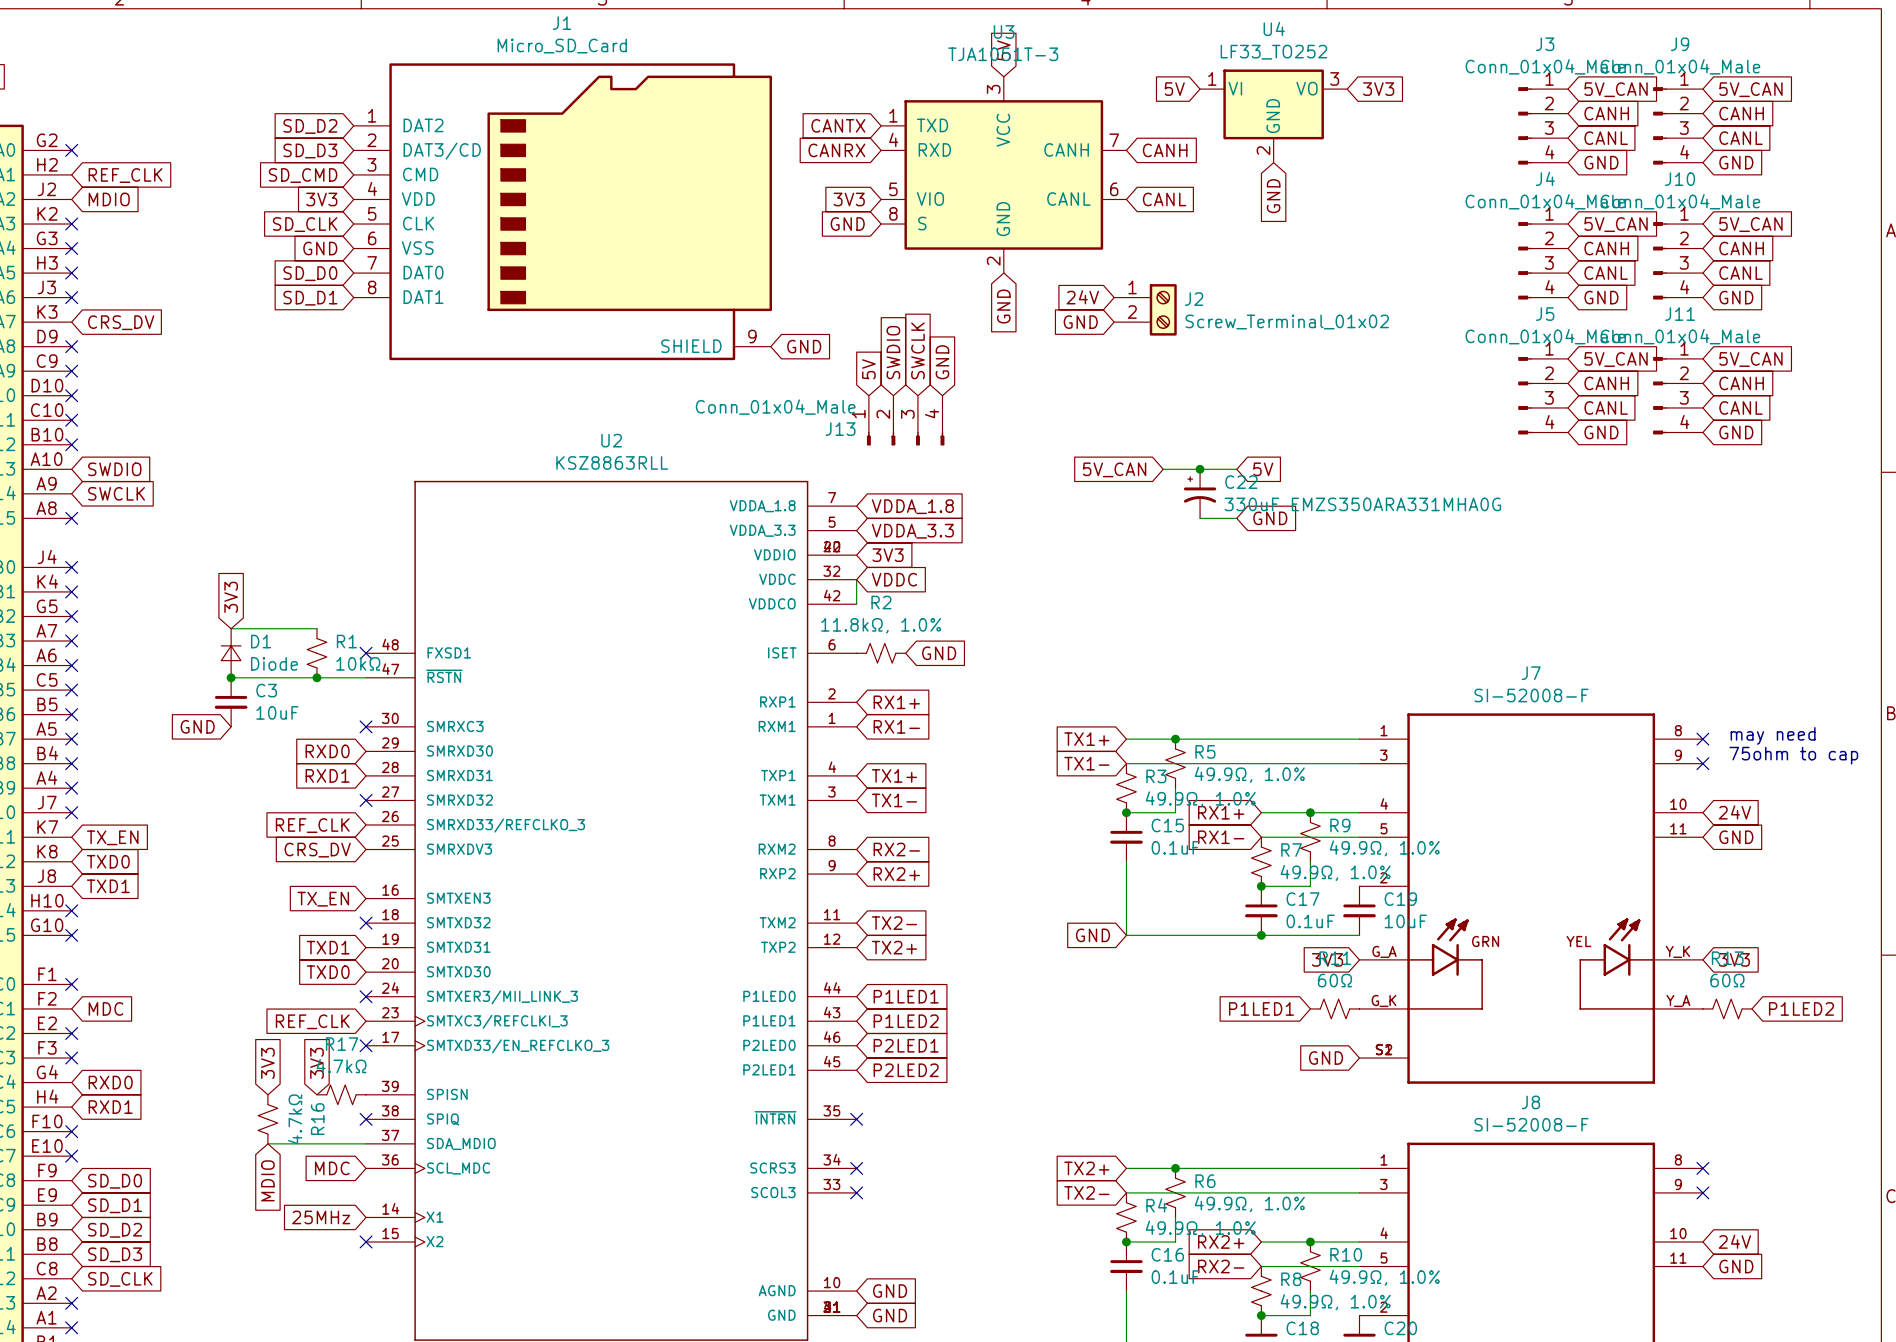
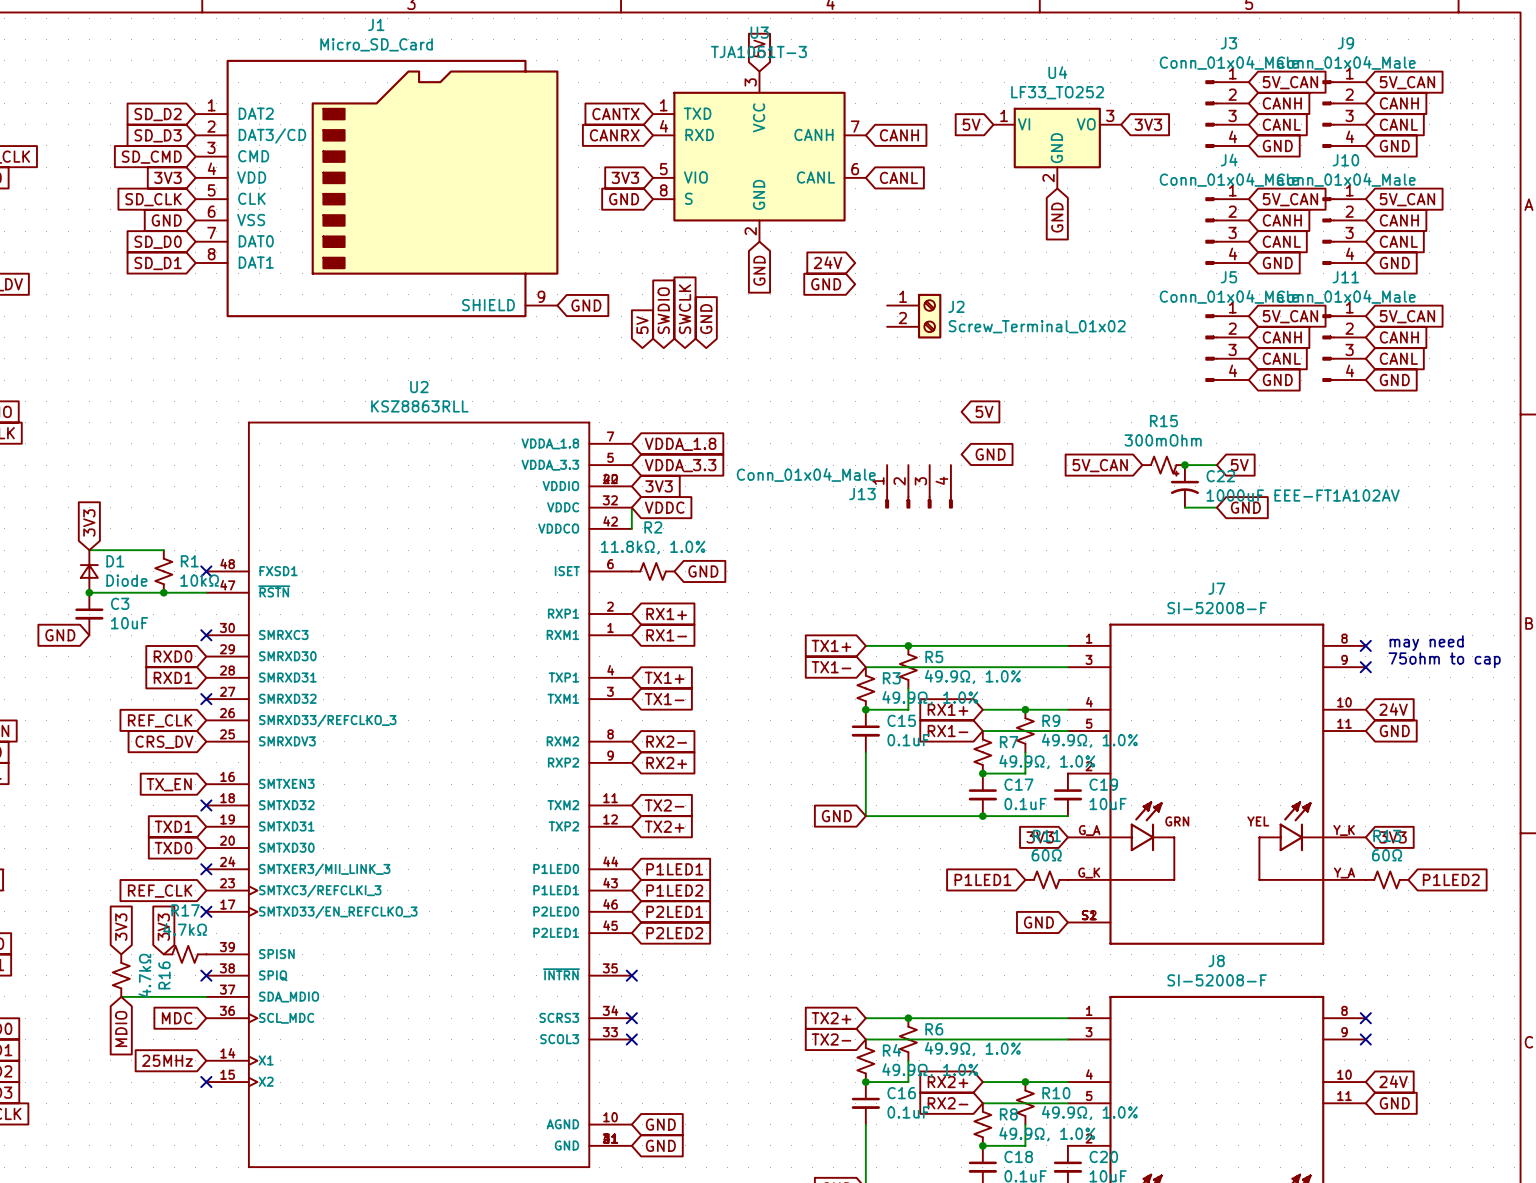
global label position: 5V (1174, 89) -> 5V (971, 124)
global label position: 3V3 (1378, 89) -> 3V3 (1148, 124)
U4 position: (1273, 116) -> (1057, 148)
global label position: GND (1273, 196) -> GND (1057, 217)
J2 position: (1145, 309) -> (914, 316)
J13 position: (905, 420) -> (919, 486)
global label: 5V_CAN (1114, 469) -> none
wire: (1163, 469) (1236, 469) -> none
junction: (1200, 469) -> none
C22 position: (1200, 493) -> (1184, 486)
C22 value: 330uF EMZS350ARA331MHA0G (1362, 504) -> 1000uF EEE-FT1A102AV (1303, 495)
wire: (1200, 518) (1236, 518) -> none
R15: none -> 300mOhm (1163, 465)
wire: none -> (1184, 465) (1216, 465)
junction: none -> (1184, 465)
global label: none -> 5V (1239, 465)
global label: none -> 5V_CAN (1100, 465)
wire: none -> (1184, 507) (1216, 507)
global label: none -> GND (1245, 507)

